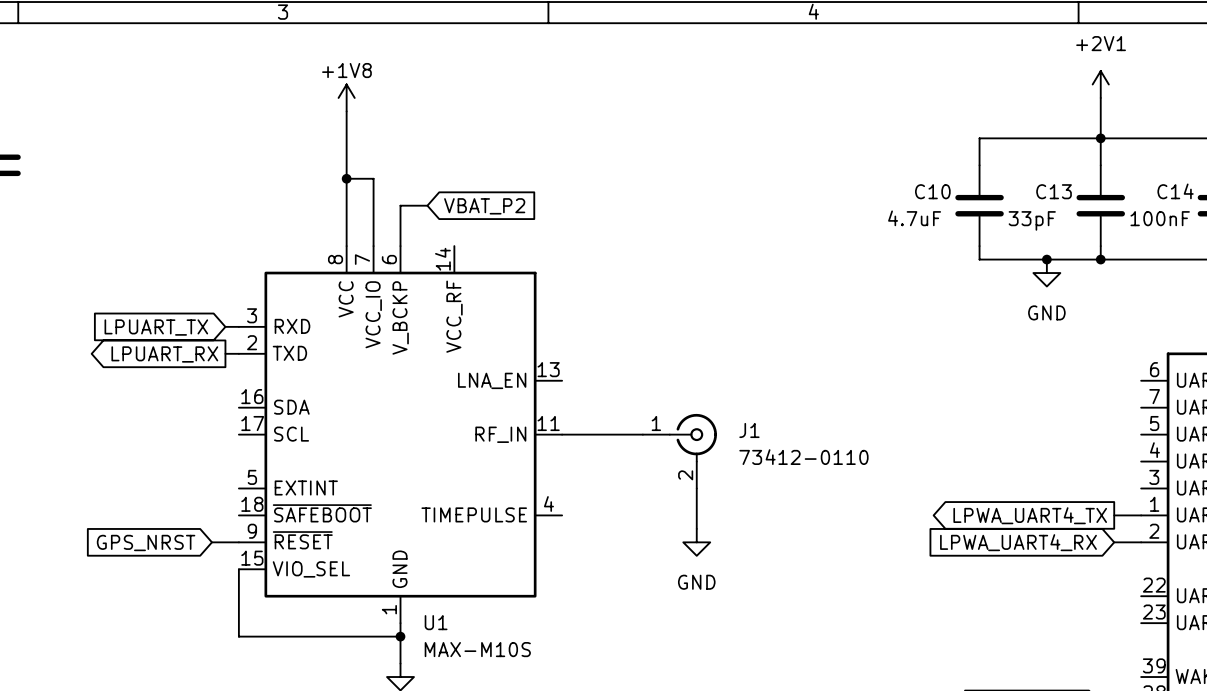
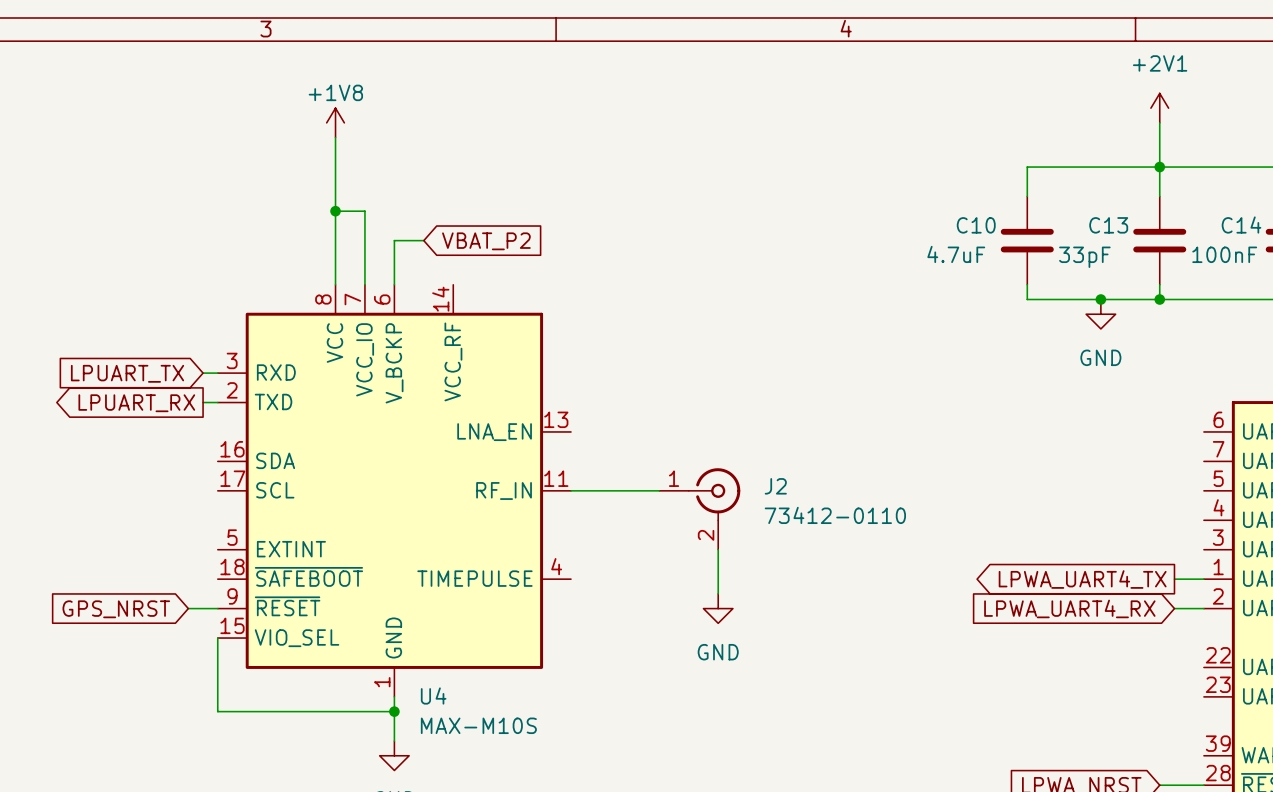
J1 name: J1 (749, 430) -> J2 (775, 486)
U1 name: U1 (436, 622) -> U4 (433, 696)

